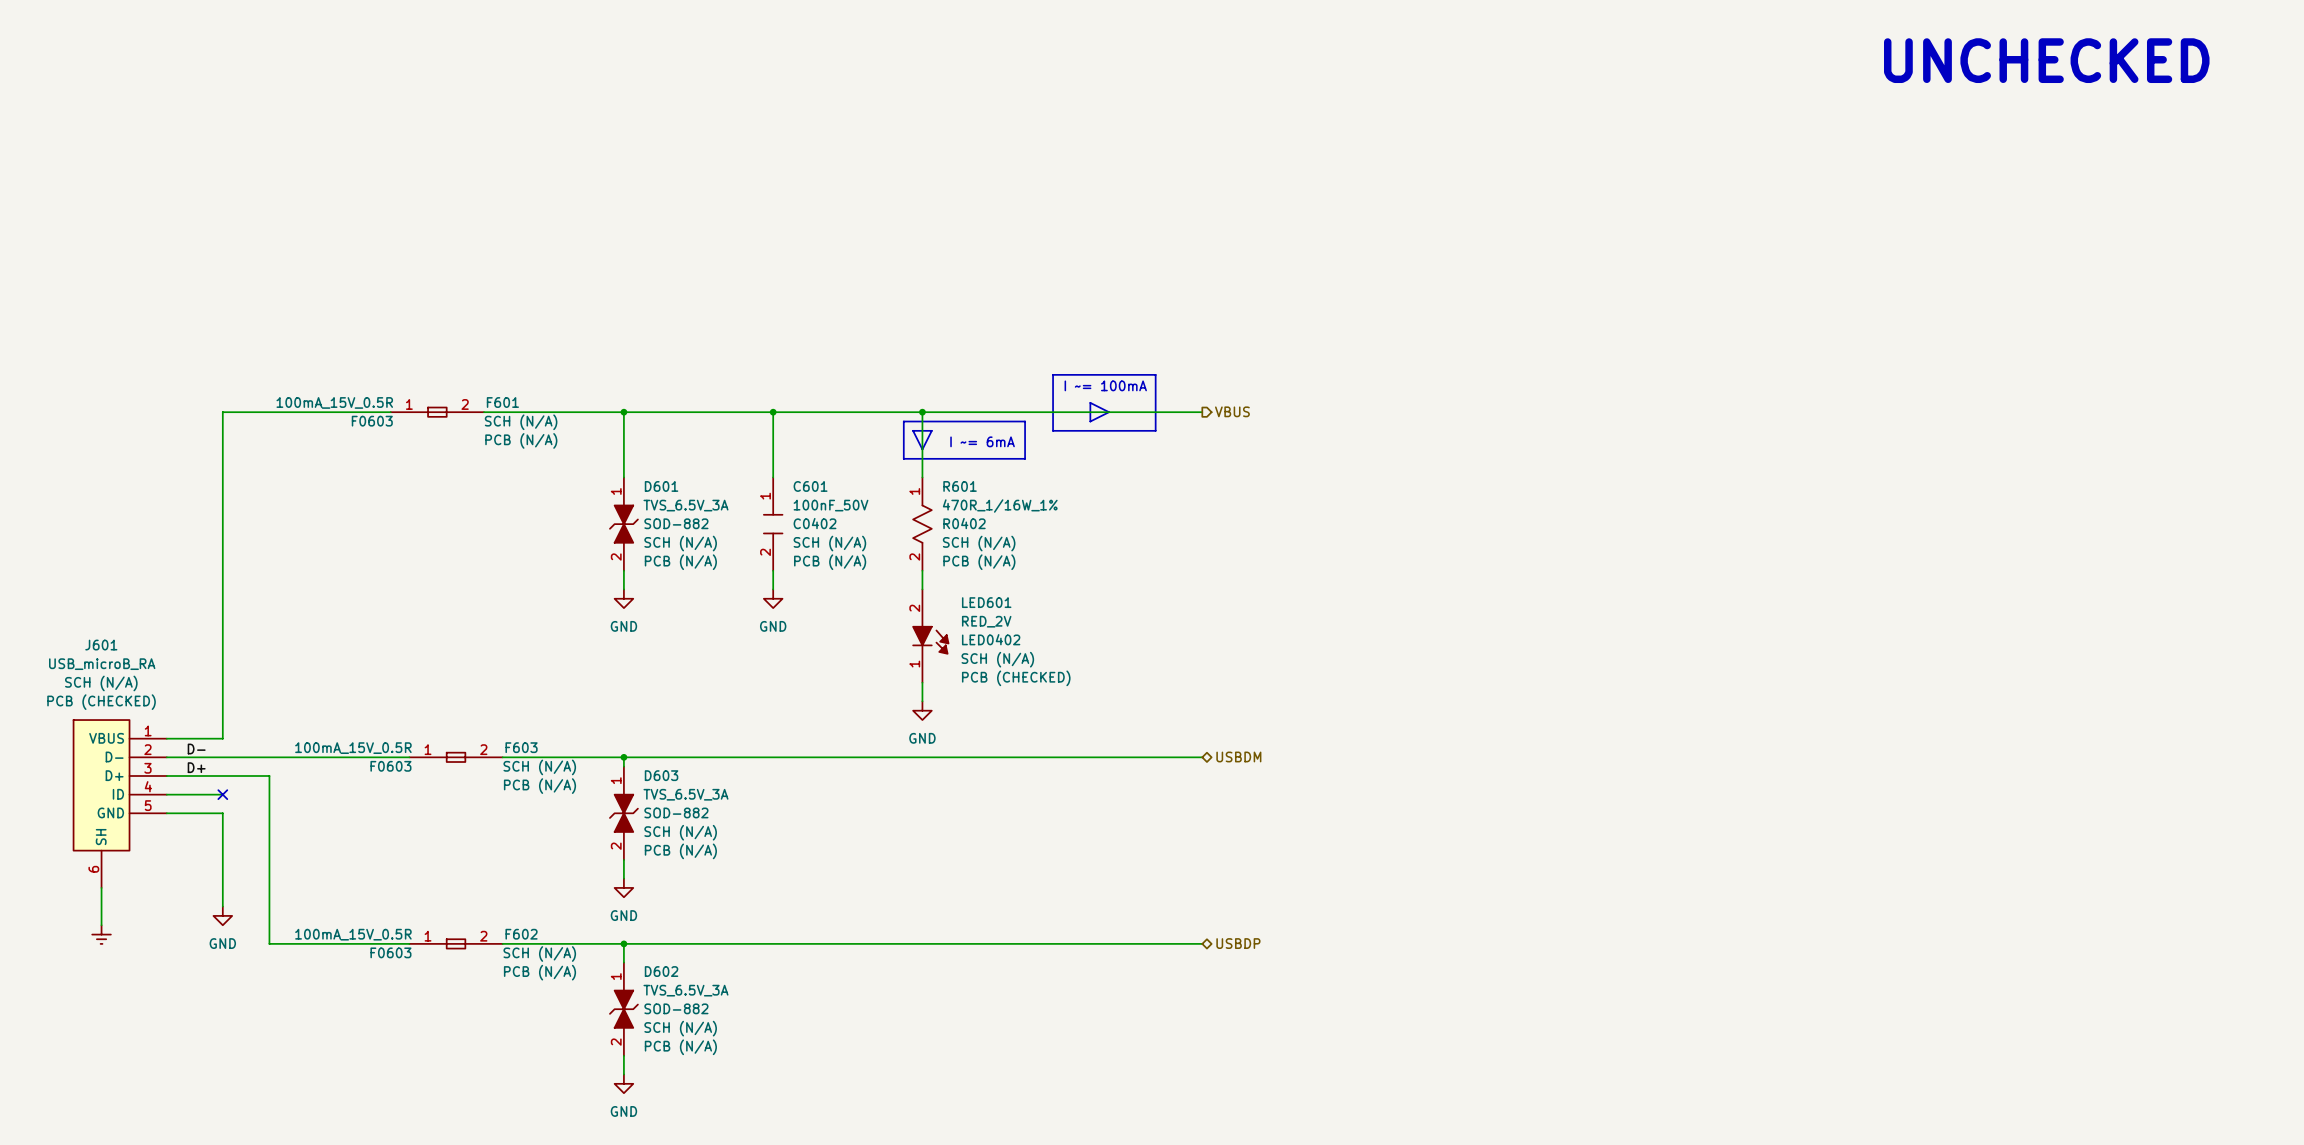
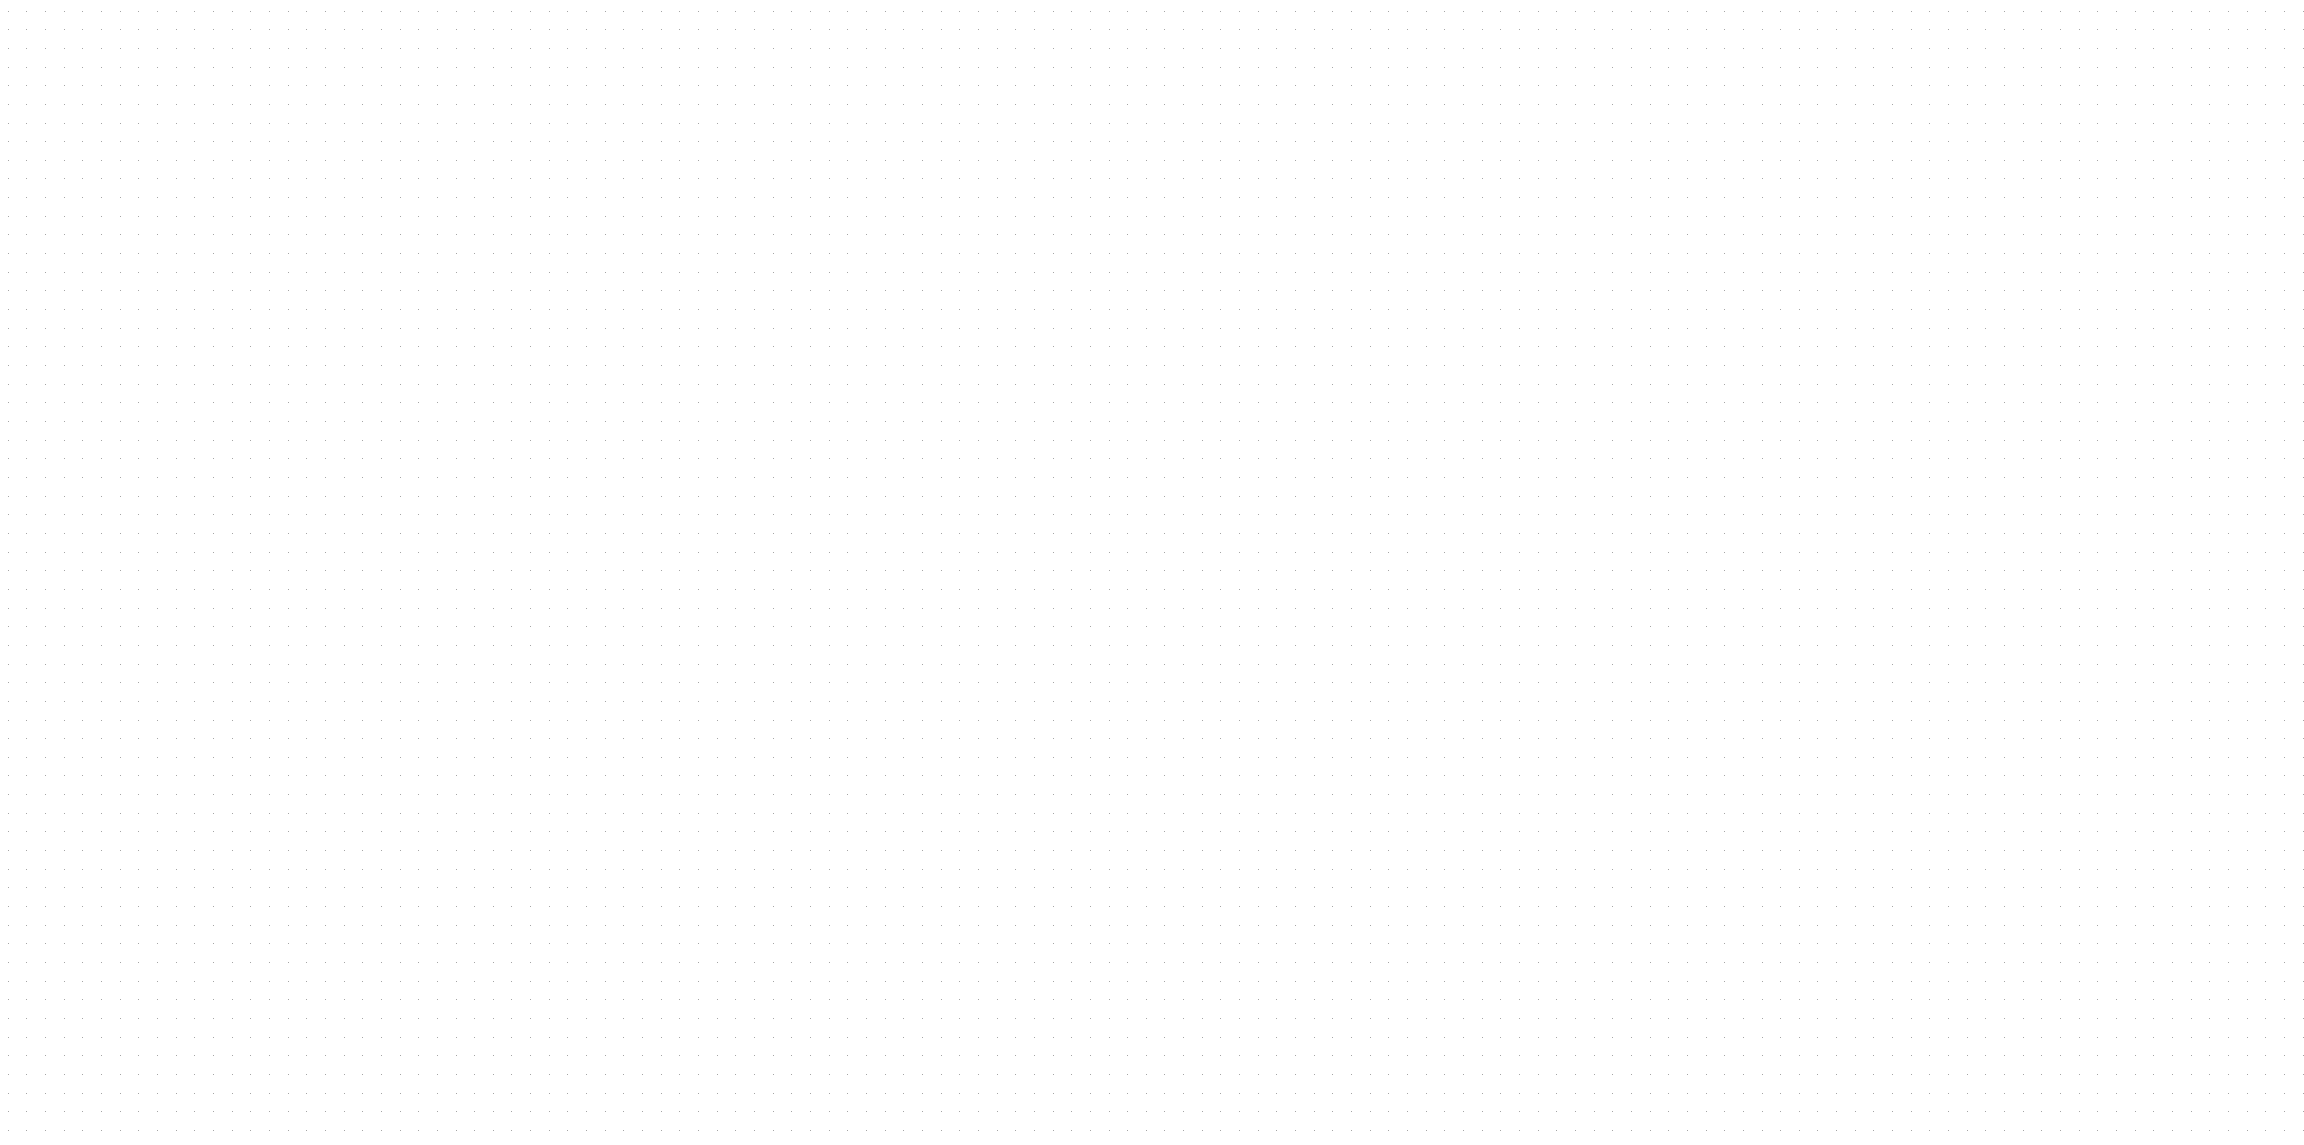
text: UNCHECKED (2046, 60) -> none
line: (1053, 374) (1155, 374) (1155, 430) (1053, 430) (1053, 374) -> none
text: I ~= 100mA (1105, 385) -> none
line: (1090, 402) (1109, 412) (1090, 421) (1090, 402) -> none
hierarchical label: VBUS (1232, 411) -> none
wire: (390, 412) (222, 412) (222, 738) (166, 738) -> none
F601: 100mA_15V_0.5R (437, 412) -> none
wire: (484, 412) (1202, 412) -> none
wire: (623, 412) (623, 477) -> none
junction: (623, 412) -> none
wire: (773, 412) (773, 477) -> none
junction: (773, 412) -> none
wire: (922, 412) (922, 477) -> none
junction: (922, 412) -> none
line: (903, 421) (1025, 421) (1025, 458) (903, 458) (903, 421) -> none
line: (913, 430) (922, 449) (931, 430) (913, 430) -> none
text: I ~= 6mA (982, 441) -> none
D601: TVS_6.5V_3A (623, 524) -> none
C601: 100nF_50V (773, 524) -> none
R601: 470R_1/16W_1% (922, 524) -> none
wire: (623, 570) (623, 589) -> none
wire: (773, 570) (773, 589) -> none
wire: (922, 570) (922, 589) -> none
power symbol: GND (623, 598) -> none
power symbol: GND (773, 598) -> none
LED601: RED_2V (930, 636) -> none
wire: (922, 682) (922, 701) -> none
power symbol: GND (922, 710) -> none
label: D- (196, 749) -> none
hierarchical label: USBDM (1238, 756) -> none
wire: (166, 757) (409, 757) -> none
F603: 100mA_15V_0.5R (456, 757) -> none
wire: (502, 757) (1202, 757) -> none
wire: (623, 757) (623, 766) -> none
junction: (623, 757) -> none
label: D+ (196, 767) -> none
wire: (166, 775) (269, 775) (269, 943) (409, 943) -> none
wire: (166, 794) (222, 794) -> none
no-connect mark: (222, 794) -> none
J601: USB_microB_RA (120, 803) -> none
wire: (166, 813) (222, 813) (222, 906) -> none
D603: TVS_6.5V_3A (623, 813) -> none
wire: (623, 859) (623, 878) -> none
wire: (101, 887) (101, 925) -> none
power symbol: GND (623, 887) -> none
power symbol: GND (222, 915) -> none
power symbol: (101, 934) -> none
F602: 100mA_15V_0.5R (456, 943) -> none
wire: (502, 943) (1202, 943) -> none
wire: (623, 943) (623, 962) -> none
junction: (623, 943) -> none
hierarchical label: USBDP (1238, 943) -> none
D602: TVS_6.5V_3A (623, 1009) -> none
wire: (623, 1055) (623, 1074) -> none
power symbol: GND (623, 1083) -> none

